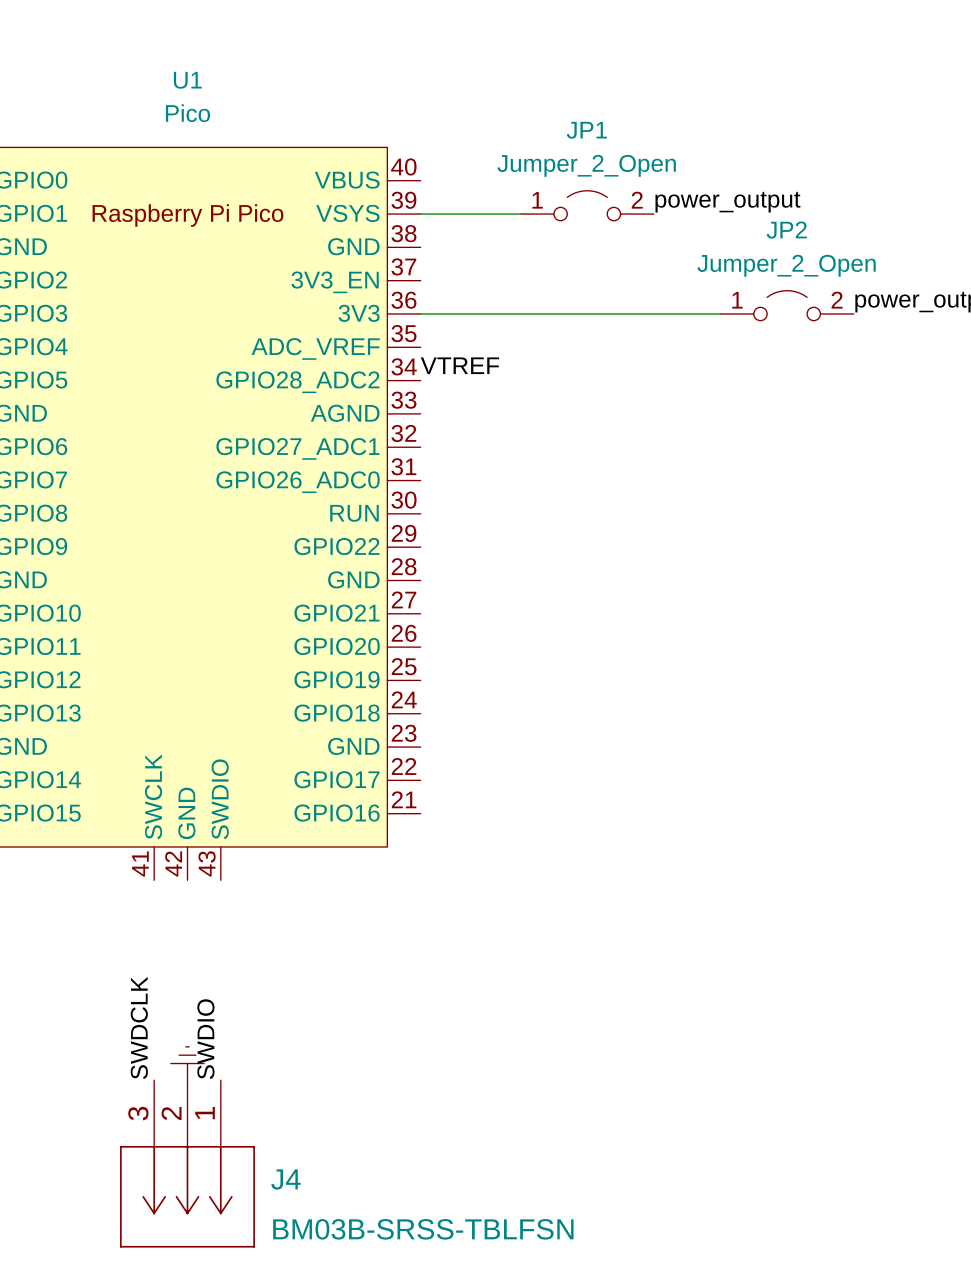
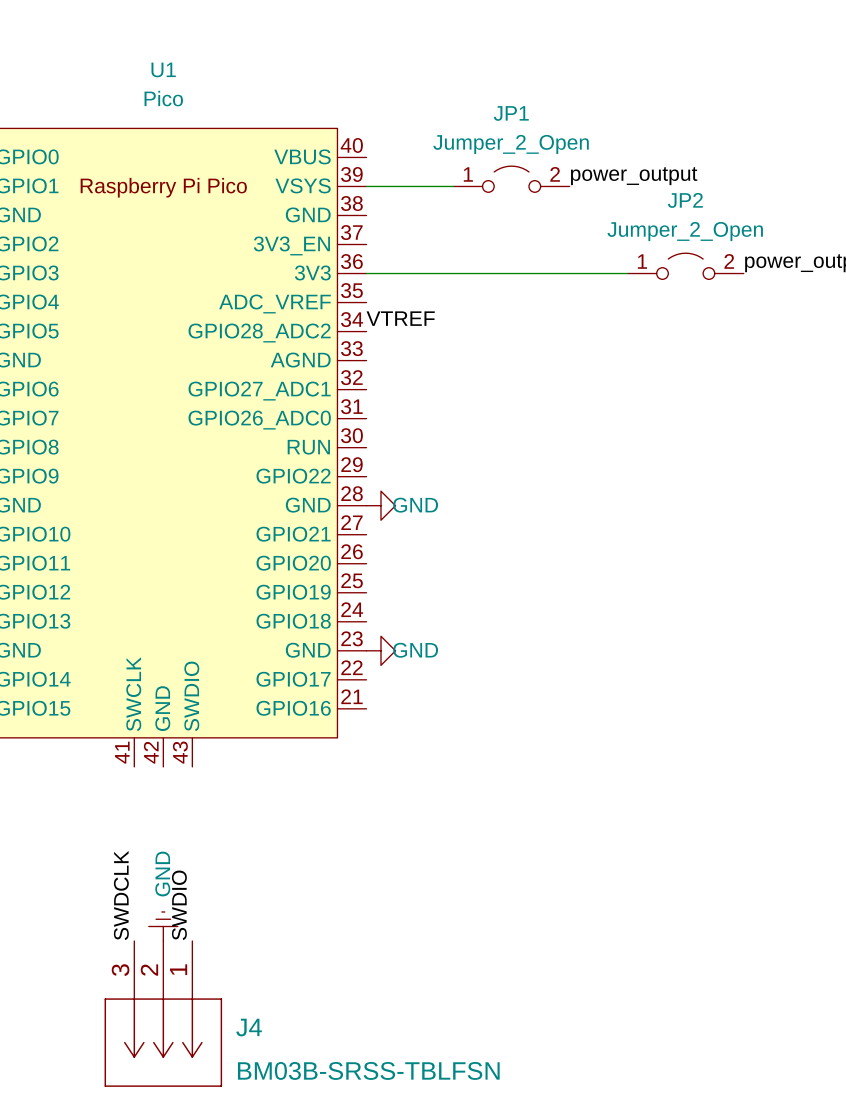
power symbol: none -> GND (380, 505)
power symbol: none -> GND (380, 650)
power symbol text: none -> GND (162, 874)

